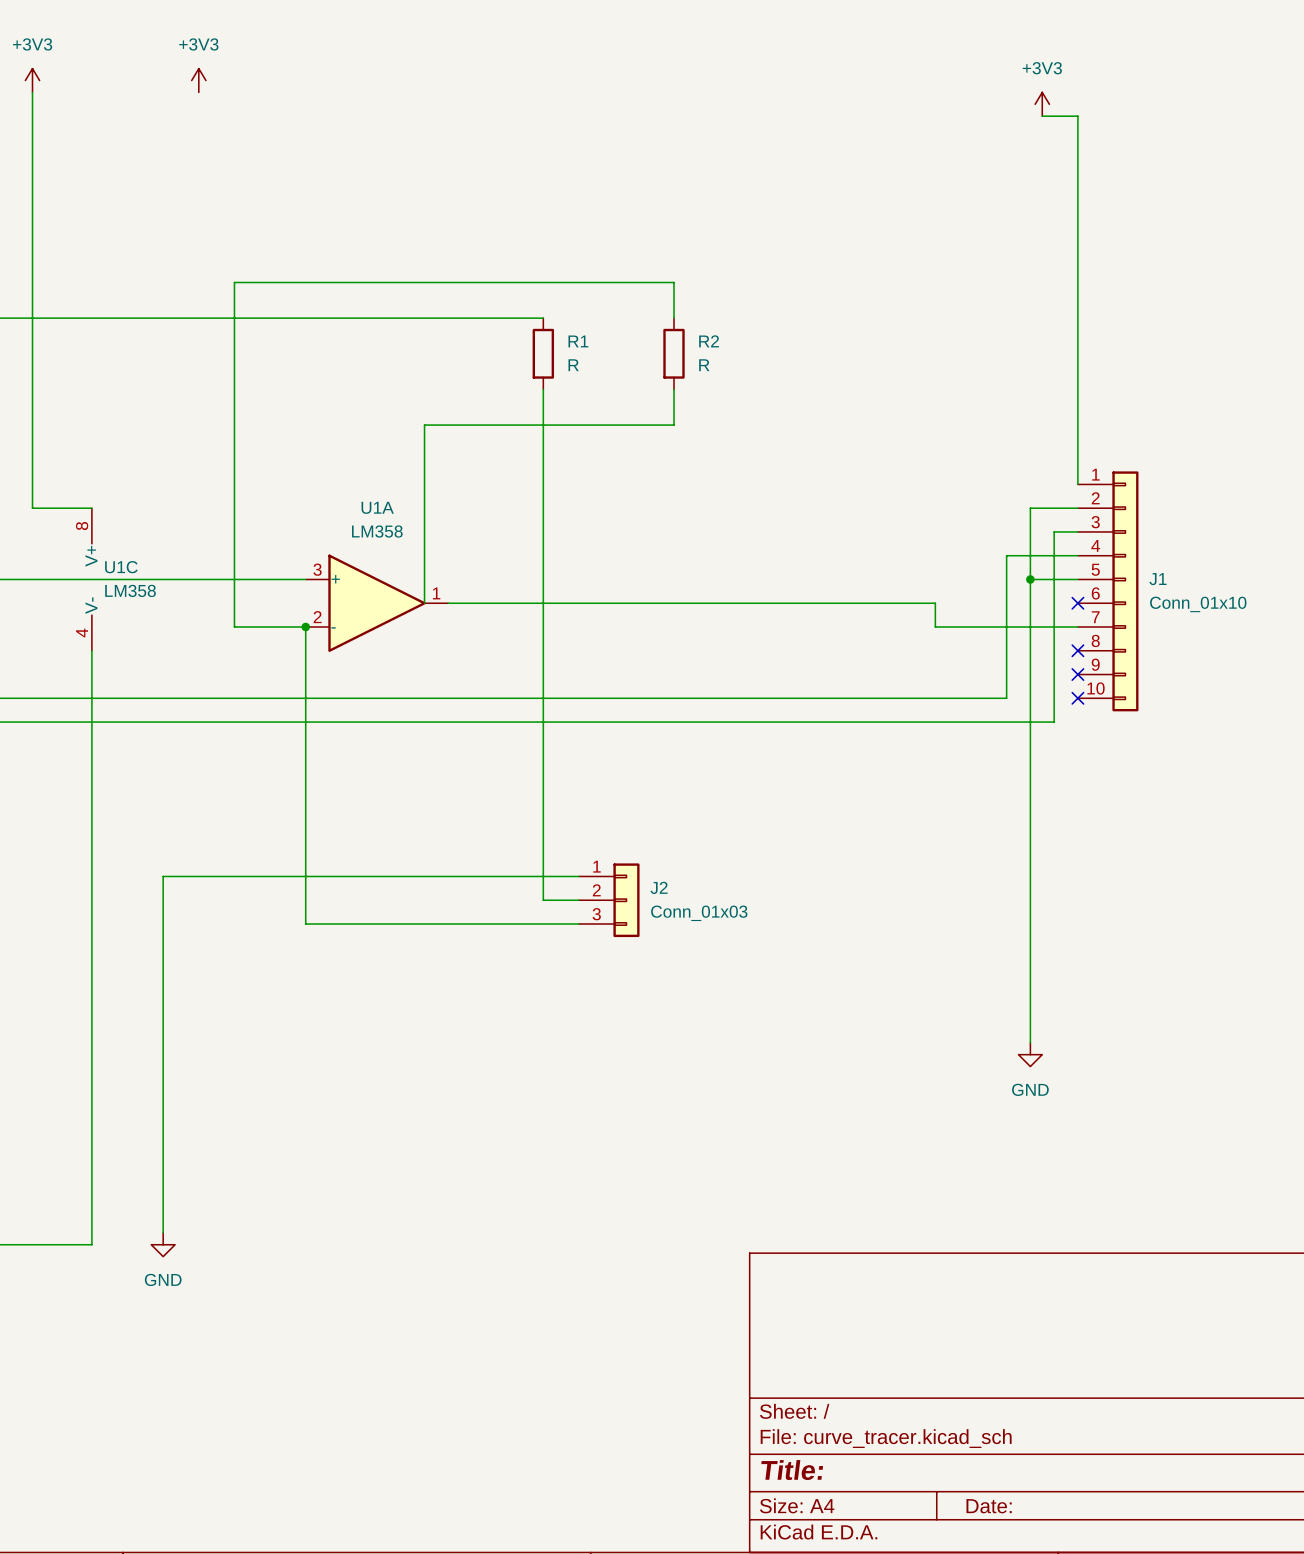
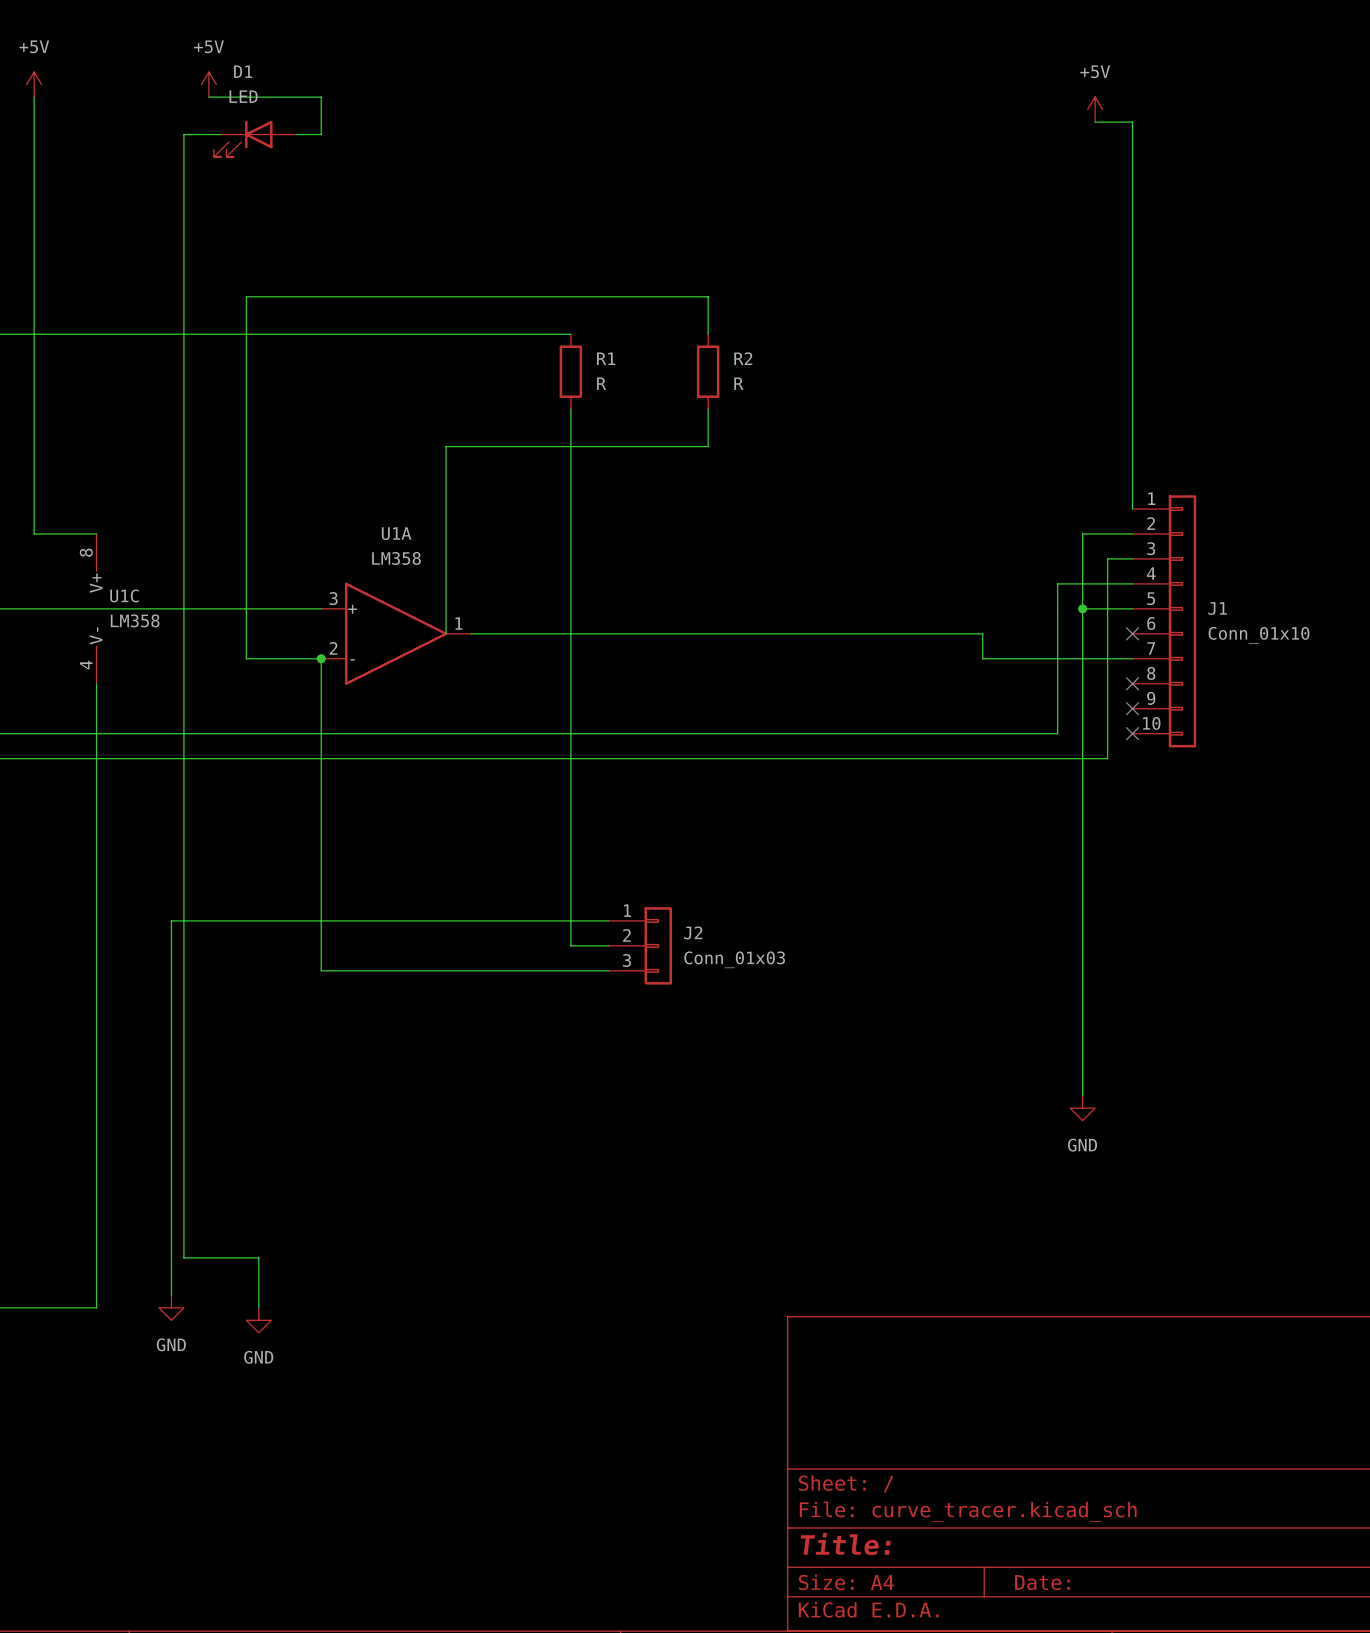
power symbol: +3V3 (32, 80) -> +5V (34, 84)
power symbol: +3V3 (198, 80) -> +5V (208, 84)
wire: none -> (208, 97) (321, 97) (321, 134) (296, 134)
power symbol: +3V3 (1042, 104) -> +5V (1095, 109)
wire: none -> (221, 134) (183, 134) (183, 1257) (258, 1257) (258, 1307)
D1: none -> LED (255, 138)
power symbol: none -> GND (258, 1320)

